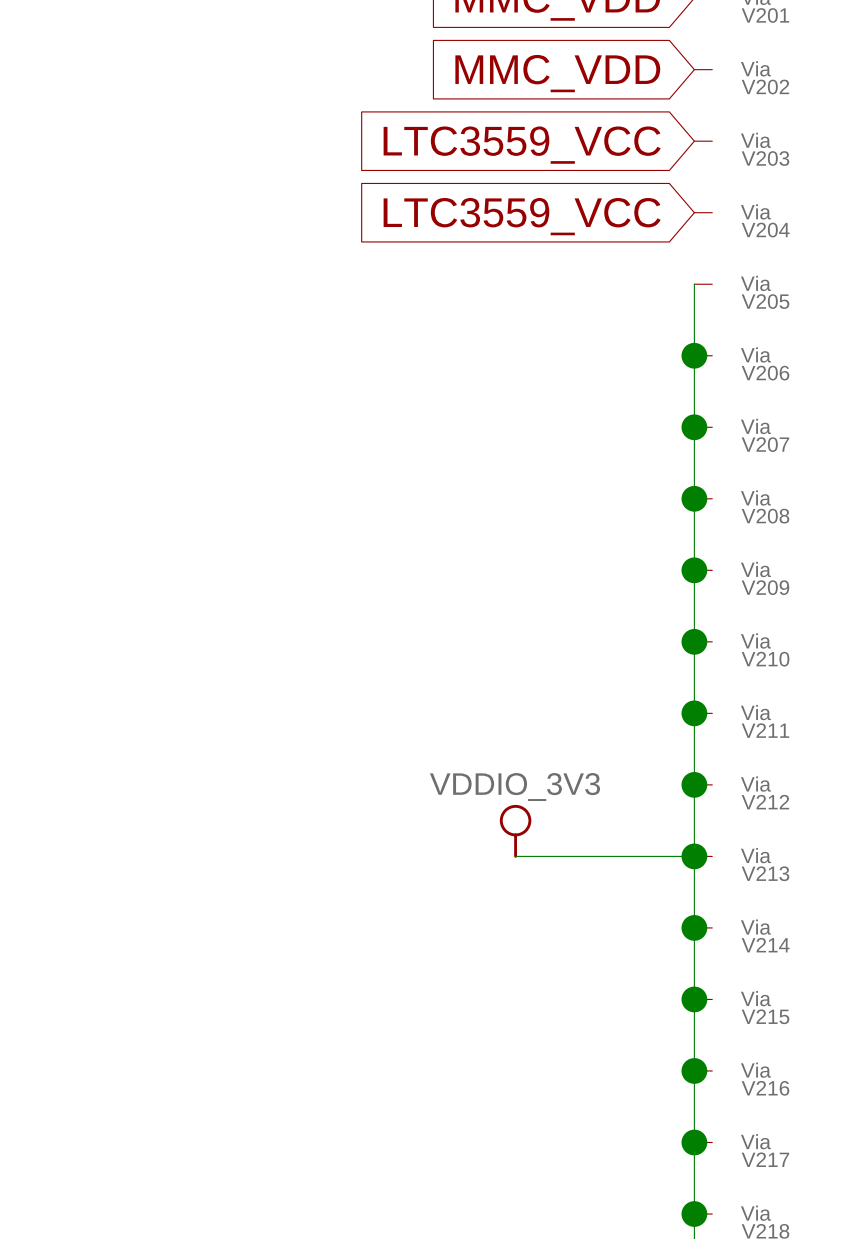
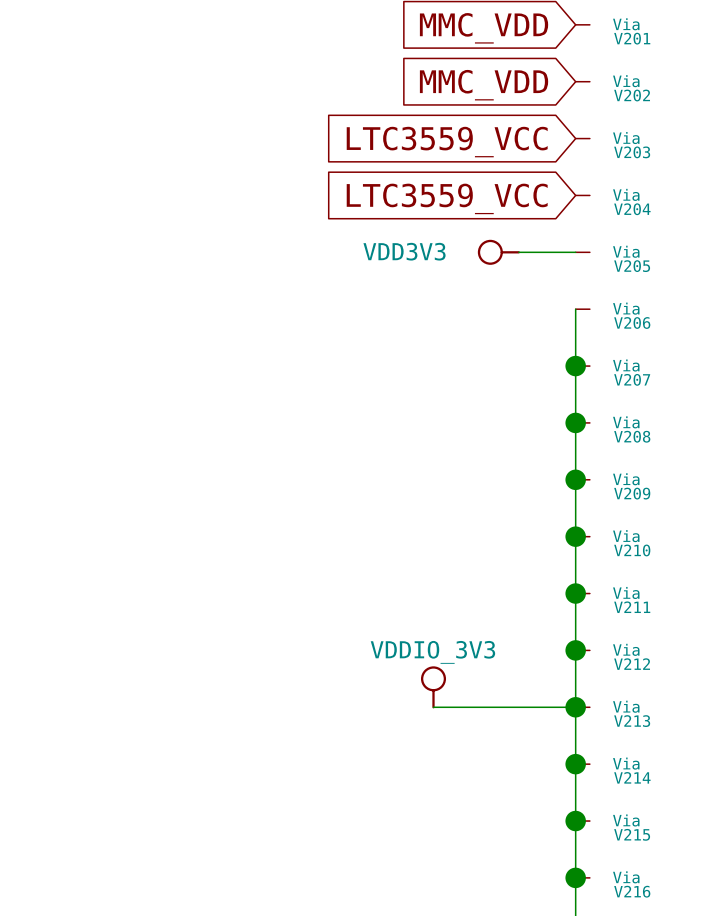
power symbol: none -> VDD3V3 (498, 252)
wire: (694, 284) (694, 355) -> (575, 252) (518, 252)
junction: (694, 355) -> none

